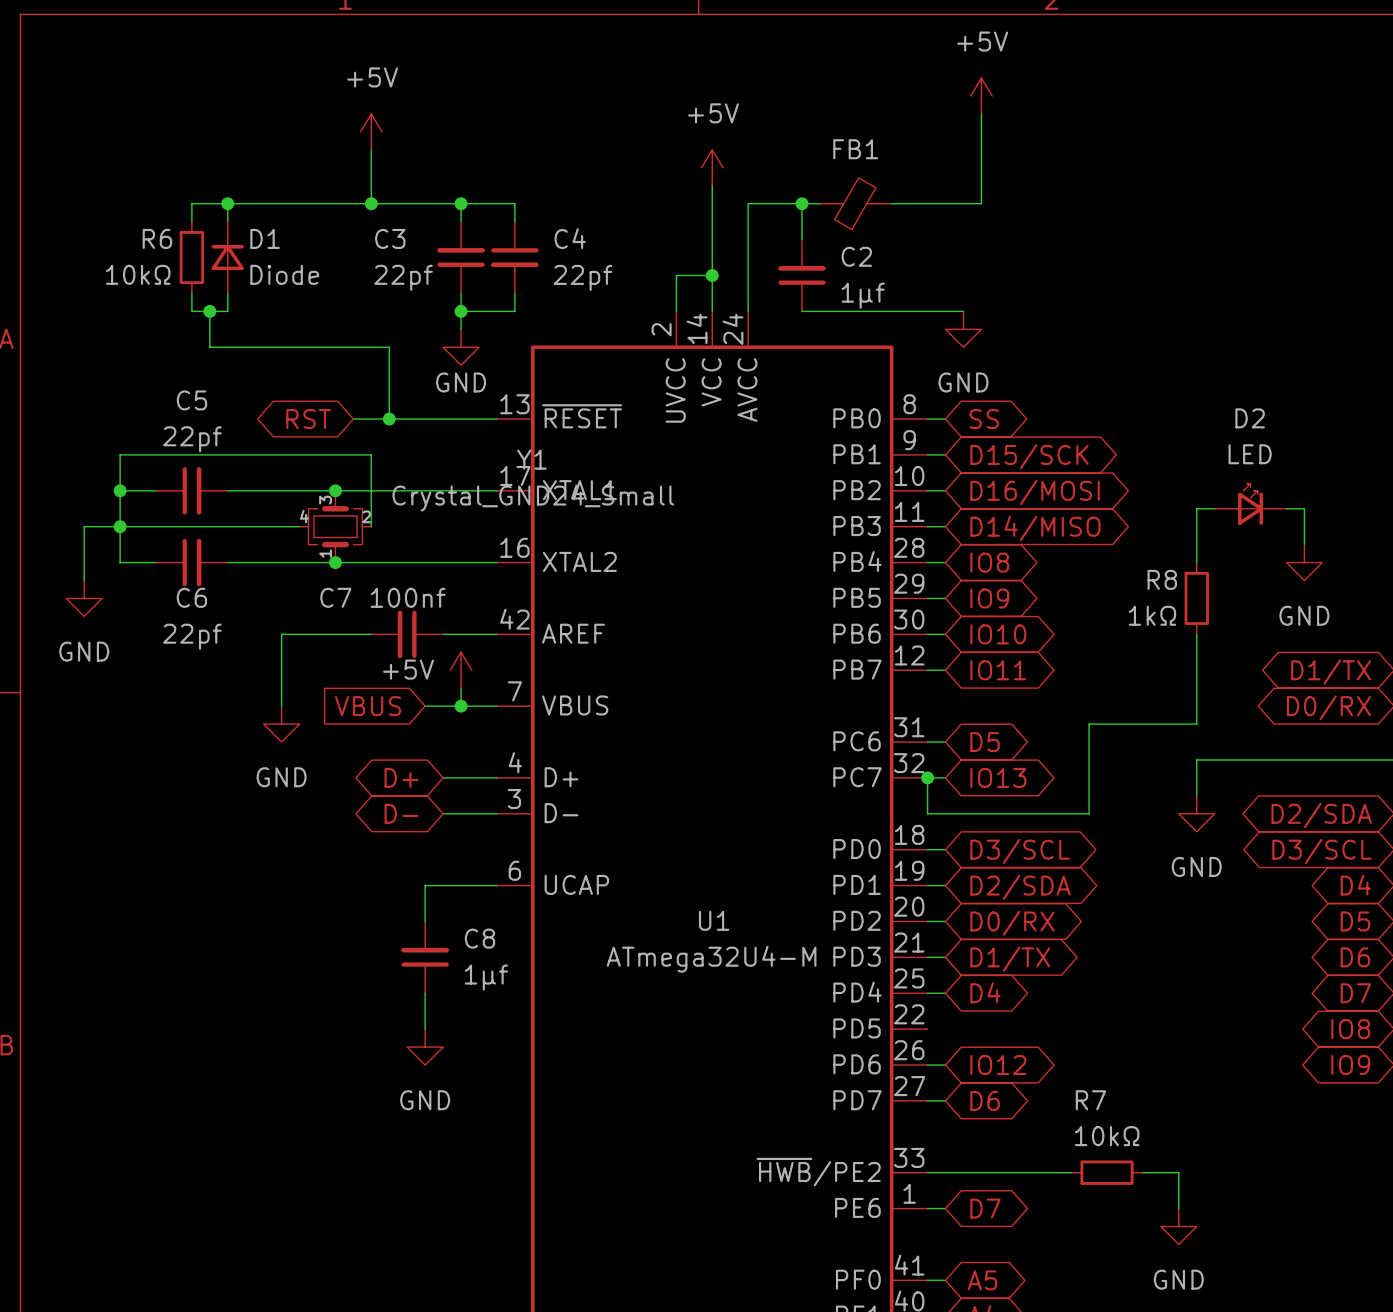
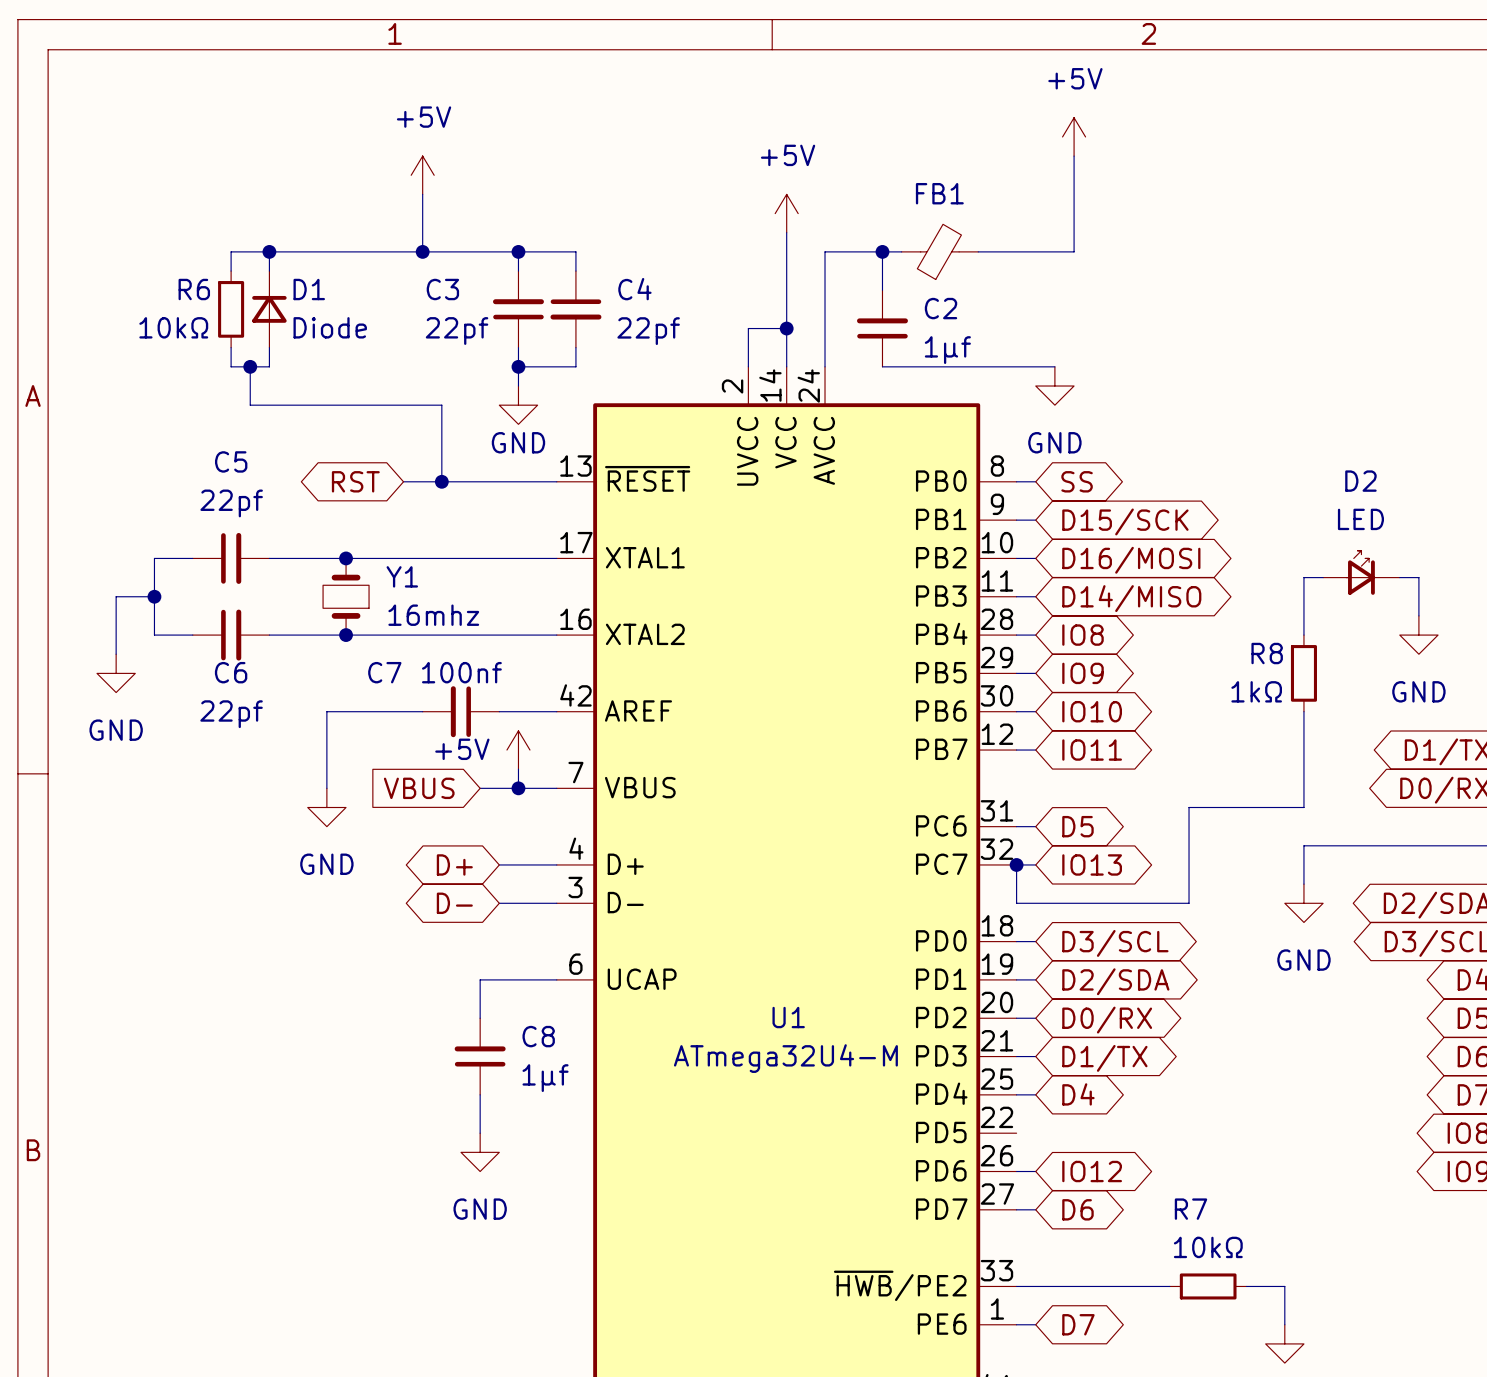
Y1 name position: Y1 (531, 459) -> Y1 (402, 576)
wire: (120, 490) (120, 454) (371, 454) (371, 526) -> none
junction: (120, 490) -> none
Y1 symbol: [299, 490, 372, 563] -> [323, 558, 370, 636]
junction position: (335, 490) -> (346, 558)
Y1 value: Crystal_GND24_Small (533, 498) -> 16mhz (433, 615)
wire: (120, 526) (299, 526) -> none
junction position: (335, 562) -> (346, 635)

